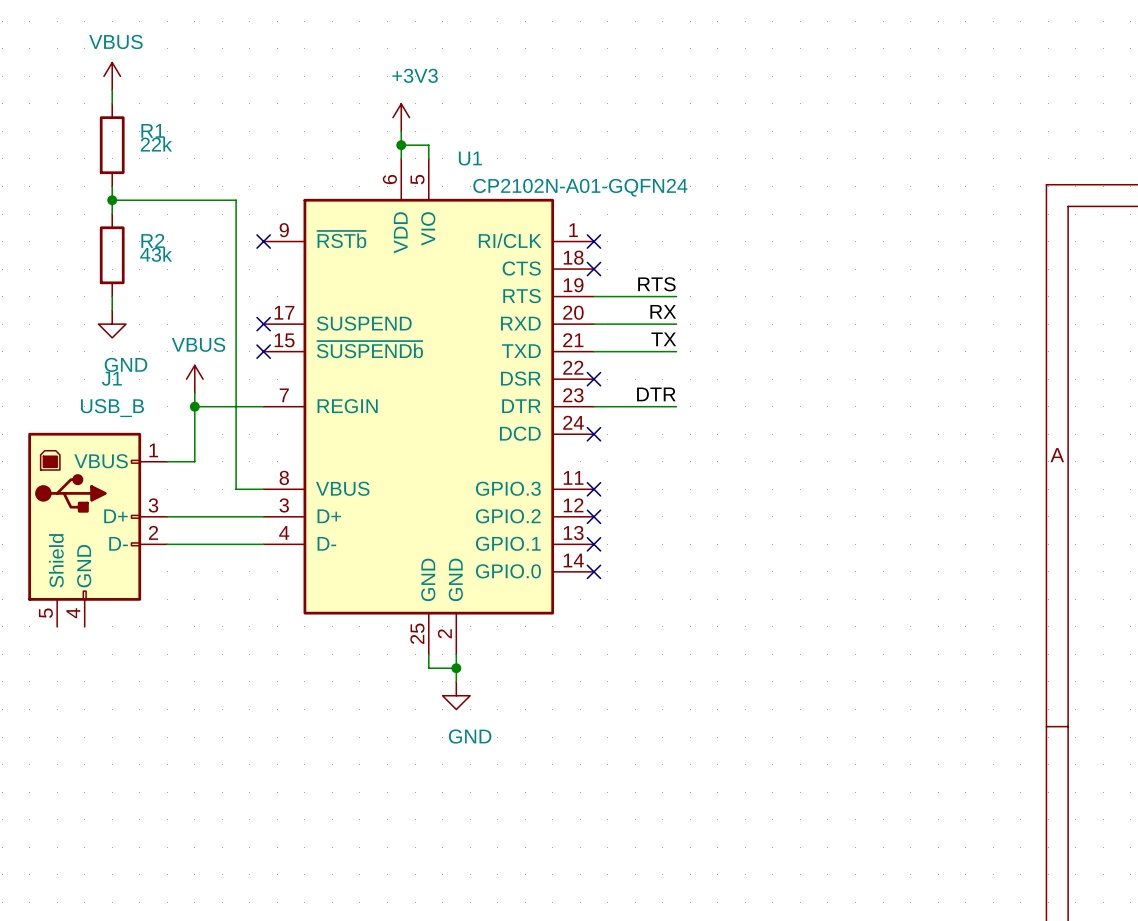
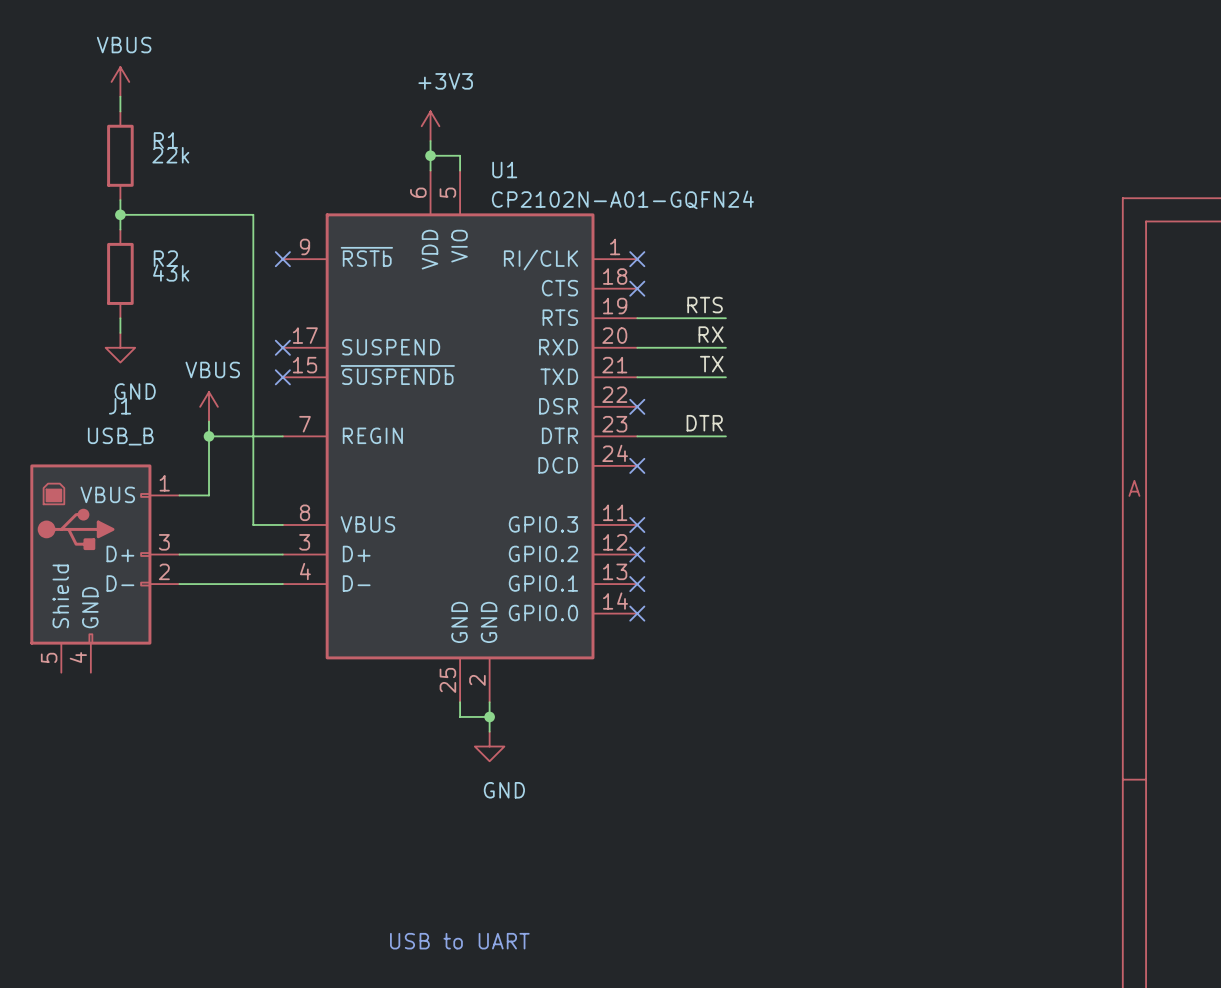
text: none -> USB to UART (459, 941)

